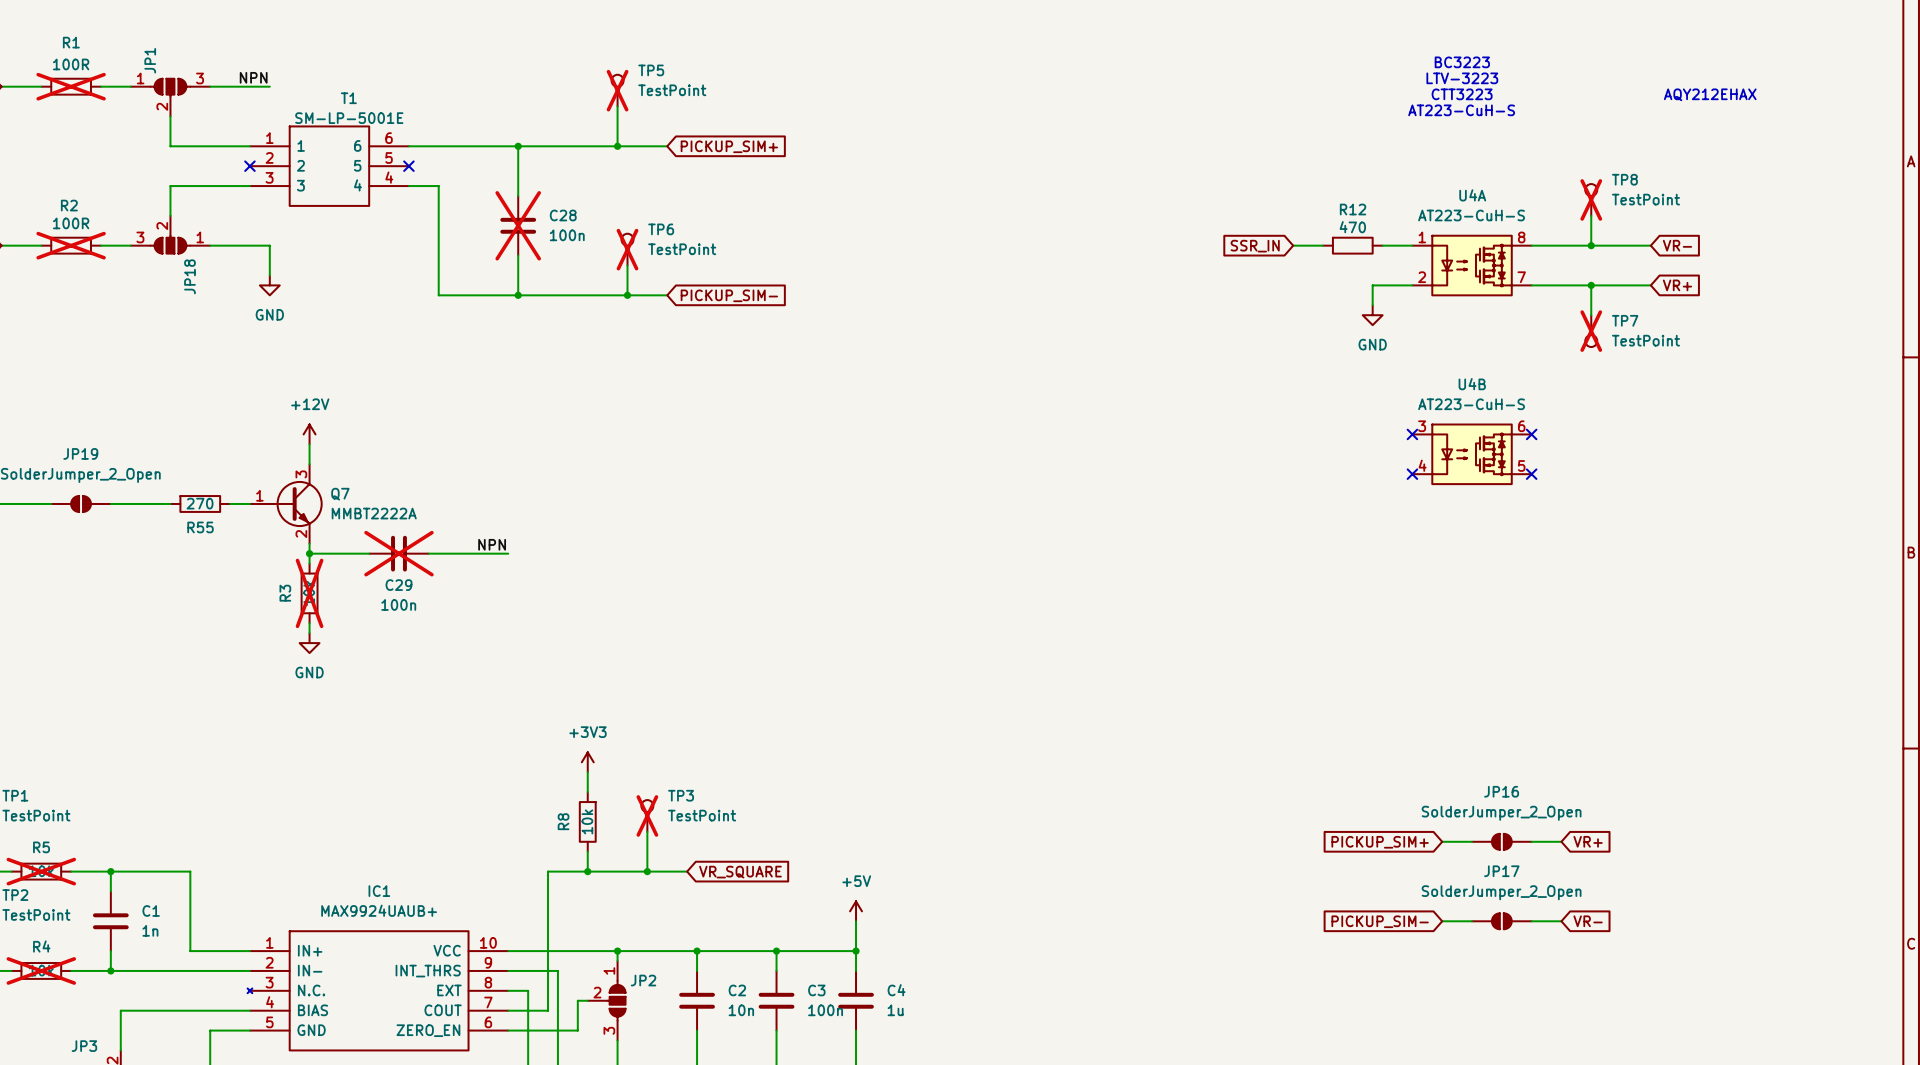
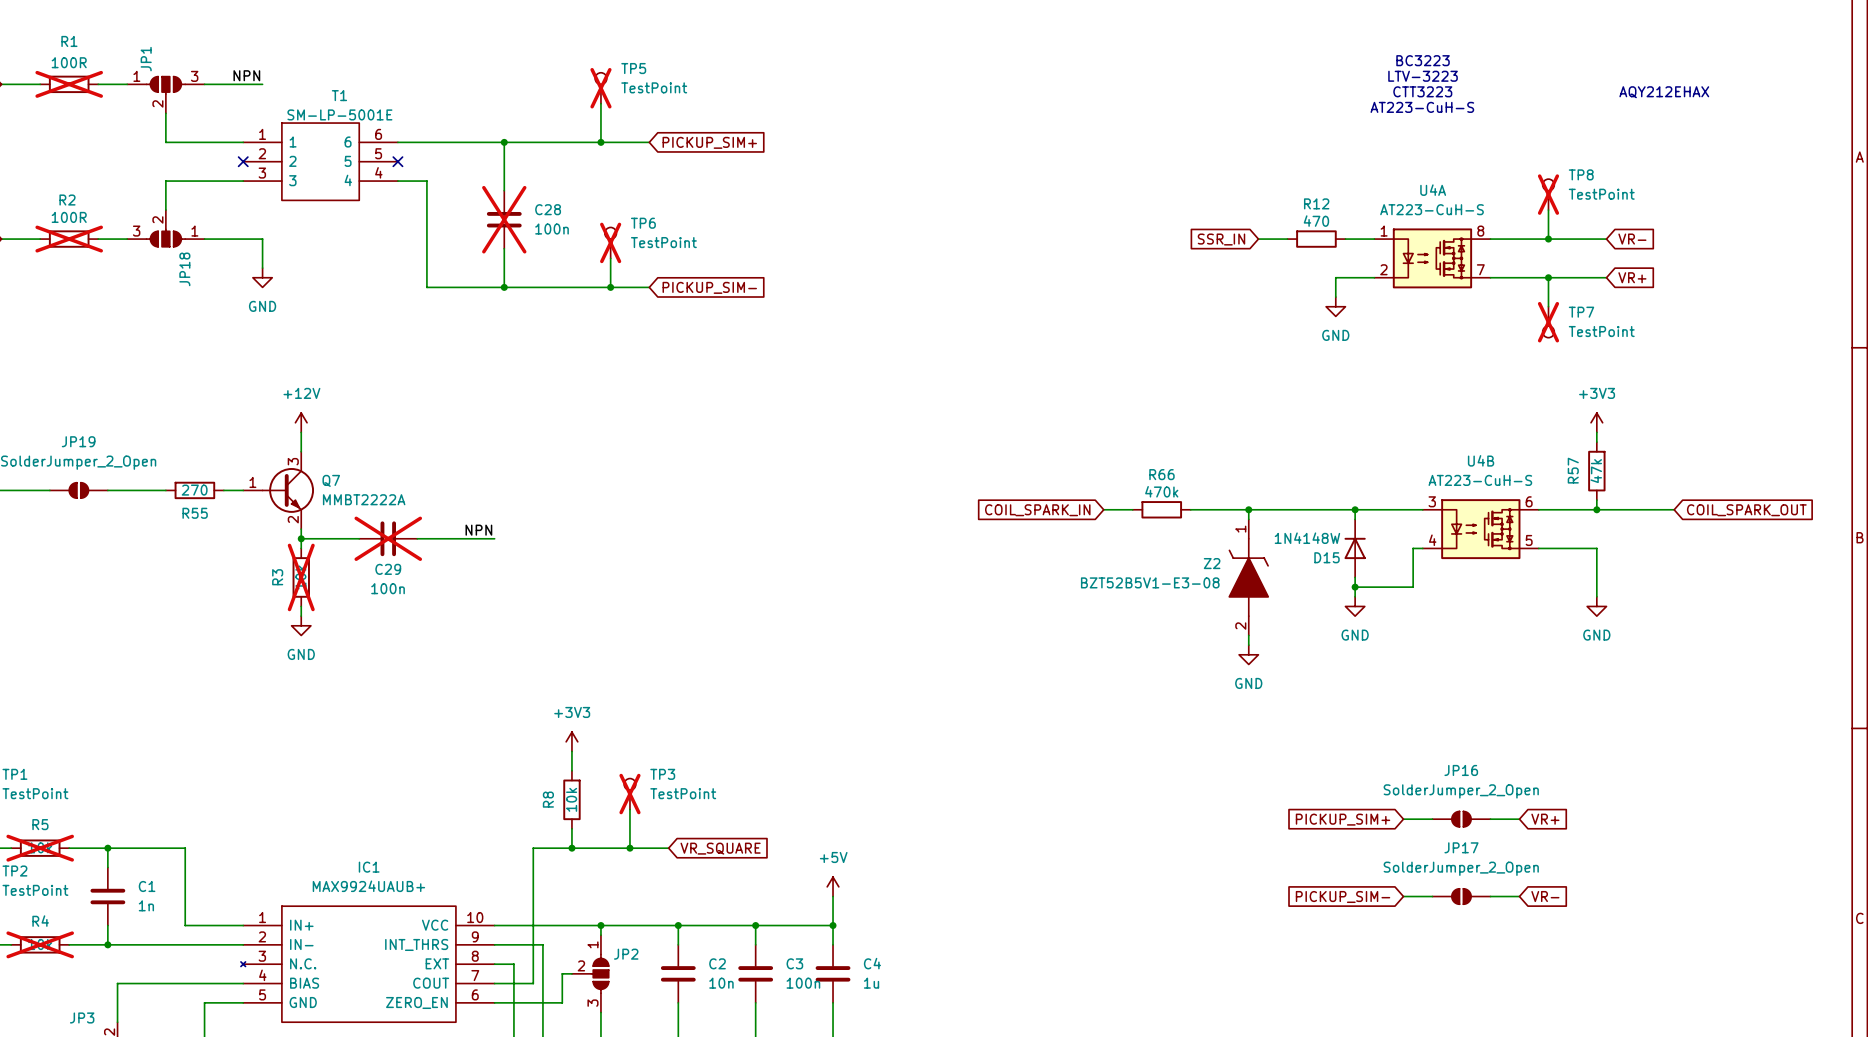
no-connect mark: (1412, 434) -> none
no-connect mark: (1531, 434) -> none
power symbol: none -> +3V3 (1596, 422)
wire: none -> (1596, 432) (1596, 442)
U4B position: (1472, 454) -> (1480, 529)
no-connect mark: (1412, 474) -> none
no-connect mark: (1531, 474) -> none
R57: none -> 47k (1596, 471)
wire: none -> (1596, 500) (1596, 509)
wire: none -> (1103, 509) (1132, 509)
R66: none -> 470k (1161, 509)
wire: none -> (1190, 509) (1422, 509)
wire: none -> (1248, 509) (1248, 519)
junction: none -> (1248, 509)
wire: none -> (1355, 509) (1355, 519)
junction: none -> (1355, 509)
wire: none -> (1538, 509) (1674, 509)
junction: none -> (1596, 509)
global label: none -> COIL_SPARK_IN (1037, 510)
global label: none -> COIL_SPARK_OUT (1746, 510)
D15: none -> 1N4148W (1355, 548)
wire: none -> (1422, 548) (1413, 548) (1413, 587) (1355, 587)
wire: none -> (1538, 548) (1596, 548) (1596, 596)
Z2: none -> BZT52B5V1-E3-08 (1248, 577)
wire: none -> (1355, 577) (1355, 596)
junction: none -> (1355, 587)
power symbol: none -> GND (1355, 606)
power symbol: none -> GND (1596, 606)
wire: none -> (1248, 635) (1248, 645)
power symbol: none -> GND (1248, 654)

